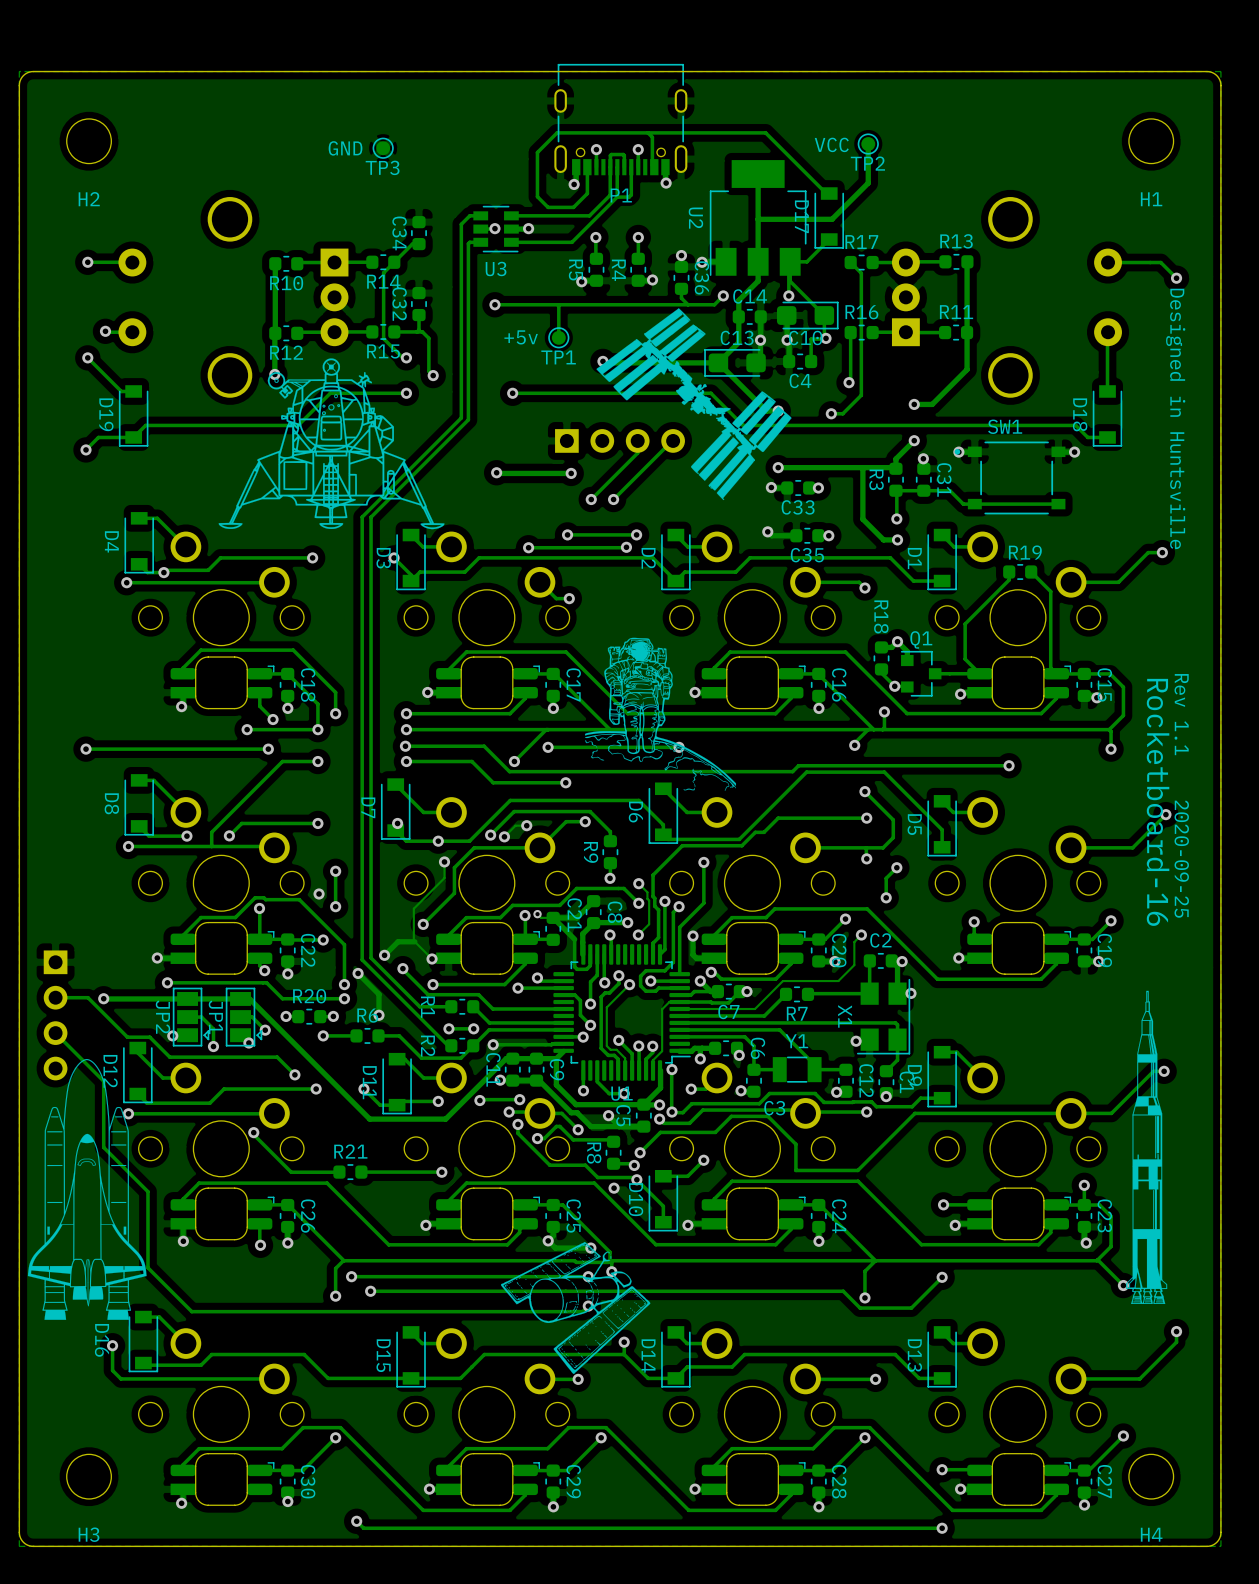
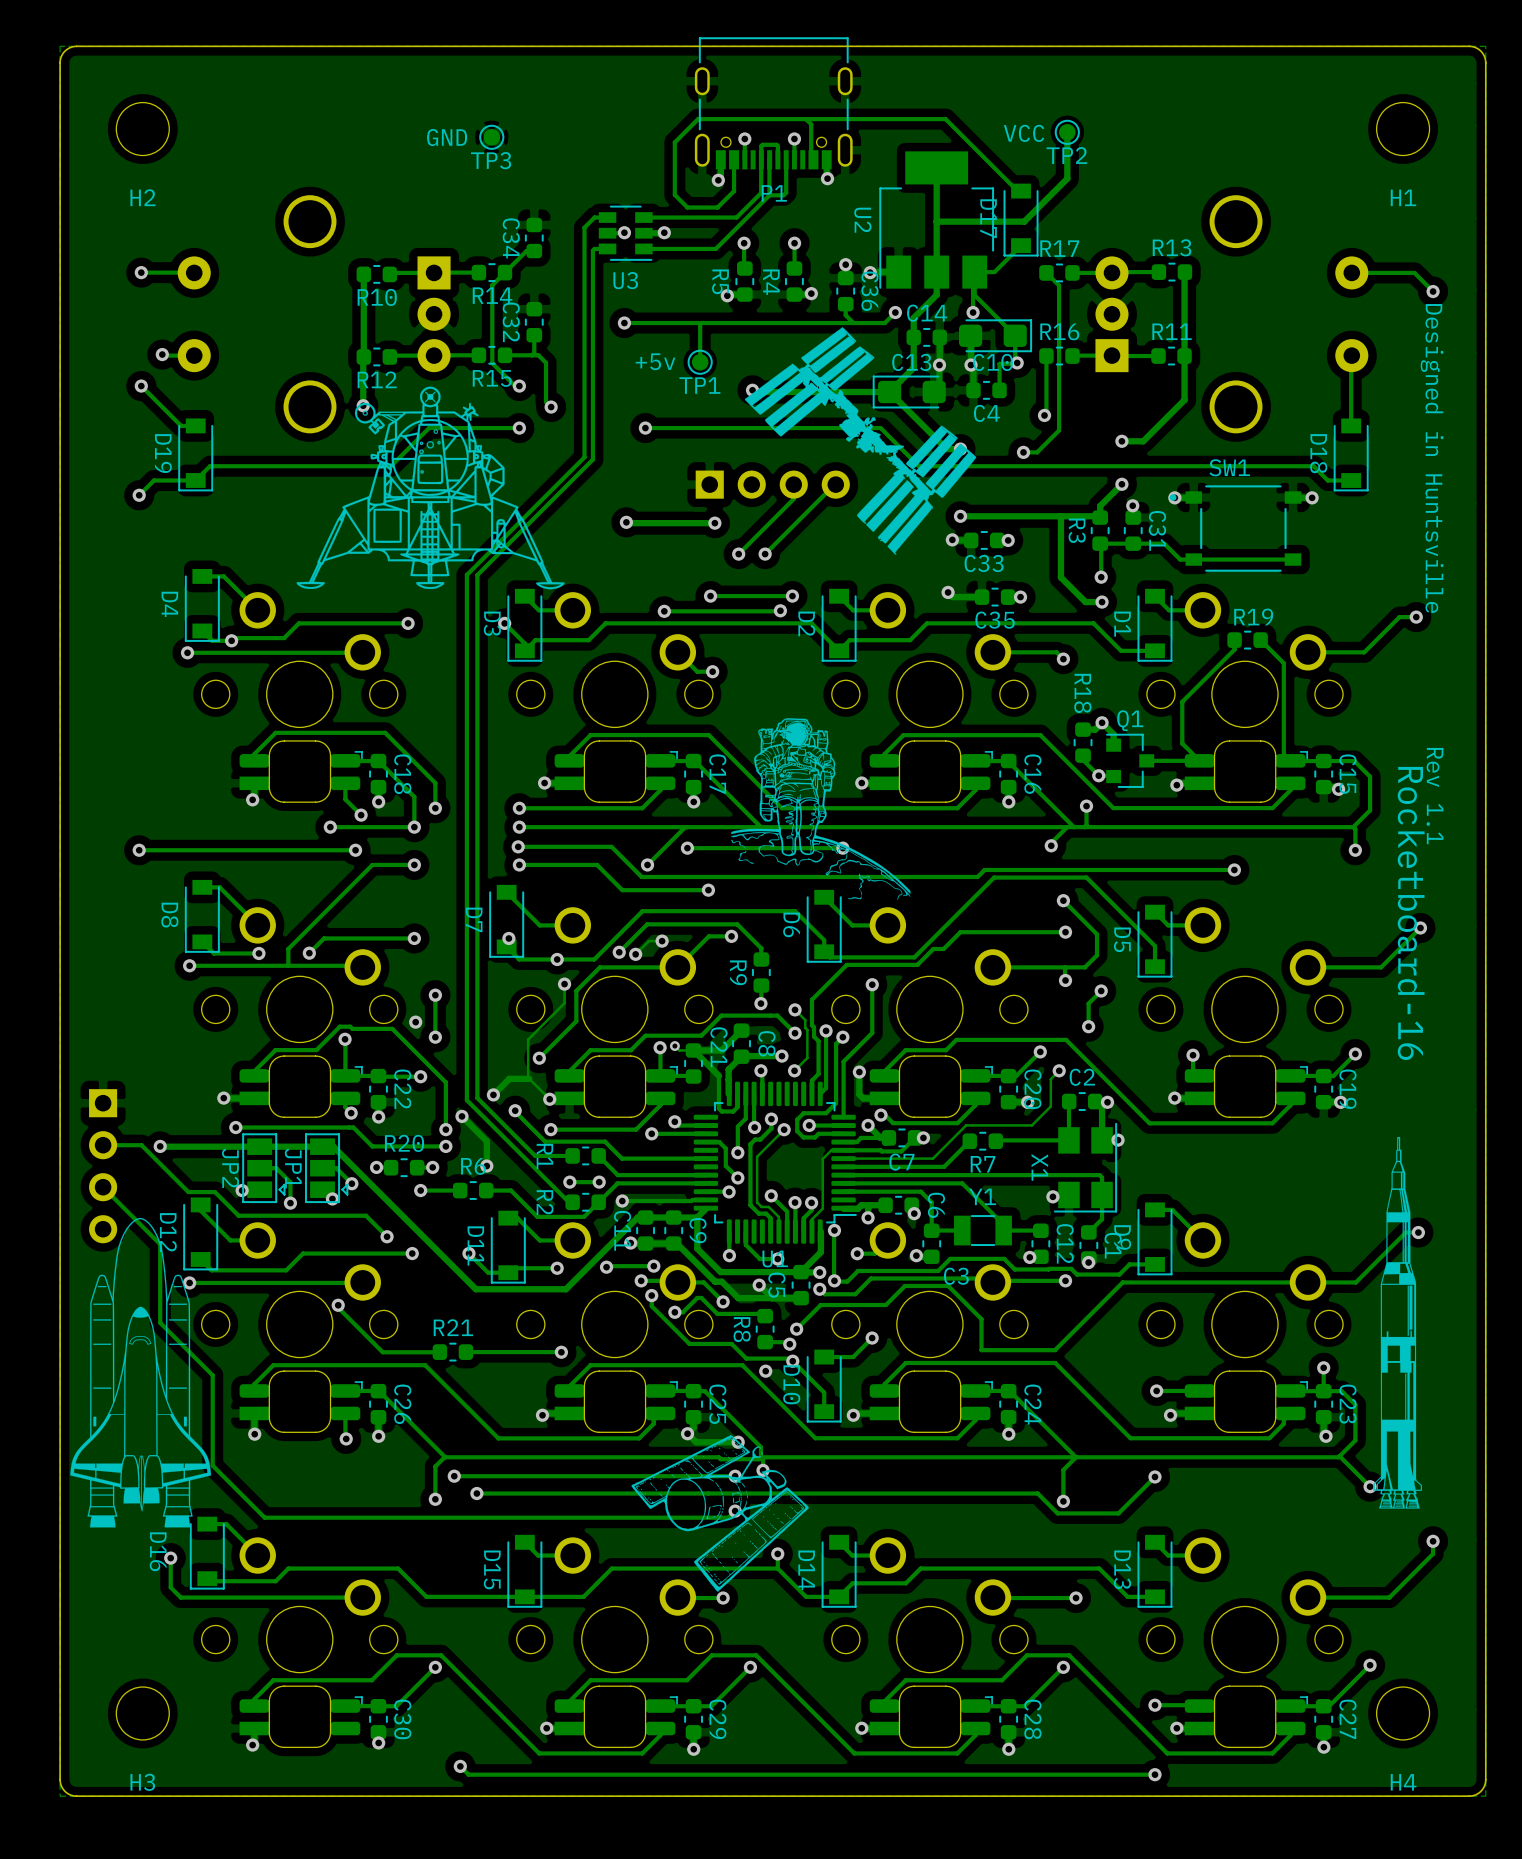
drawing shape: [1146, 674, 1189, 926] -> [1397, 747, 1444, 1061]

